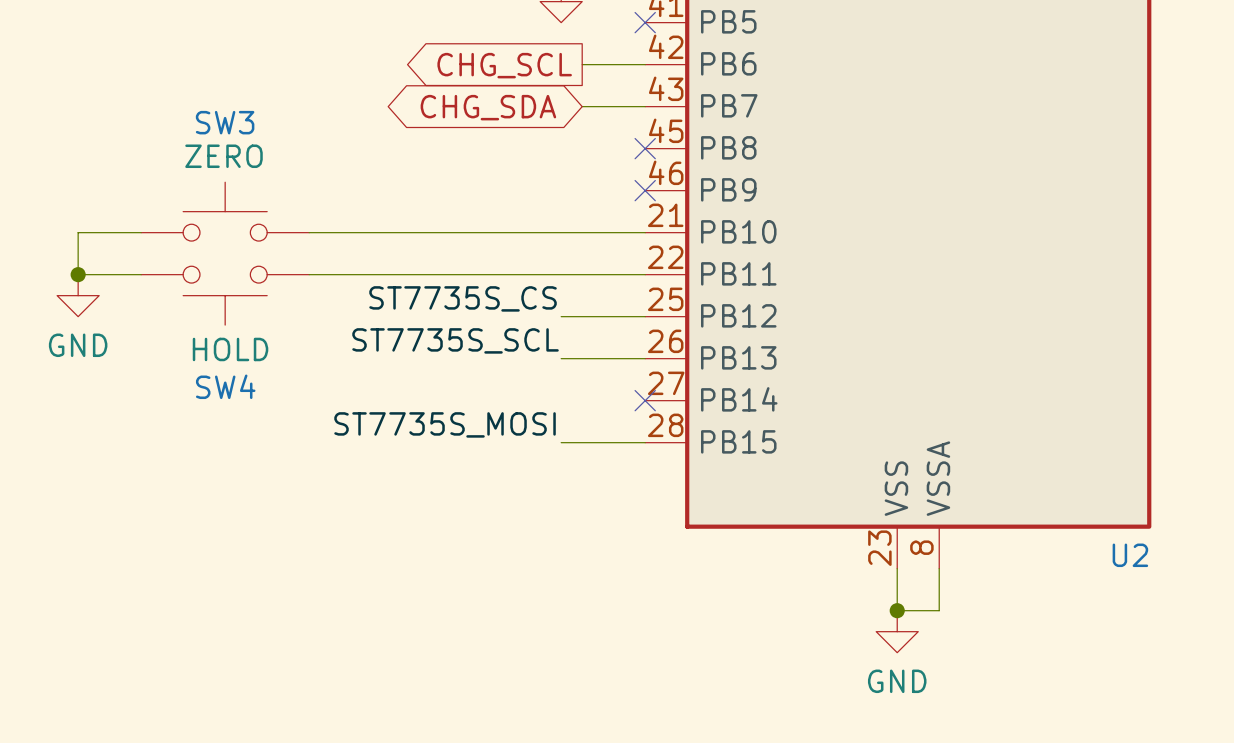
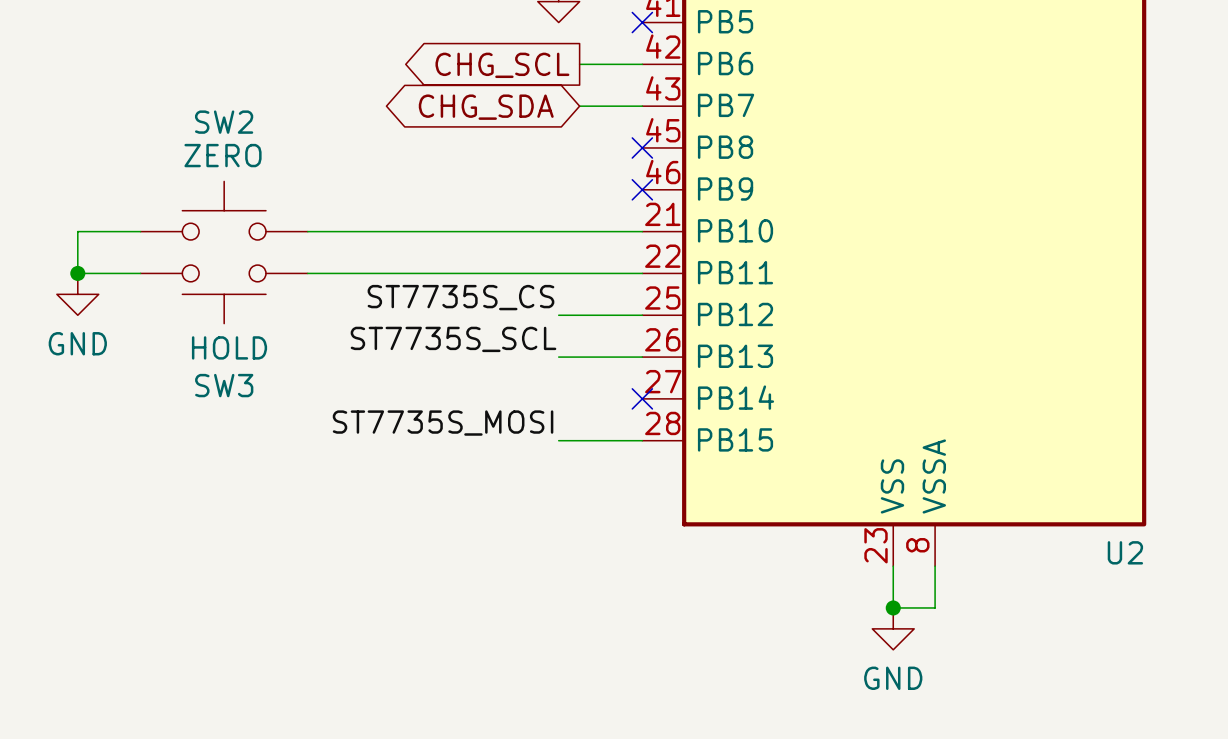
SW3 name: SW3 (225, 122) -> SW2 (224, 122)
SW4 name: SW4 (225, 386) -> SW3 (224, 385)

